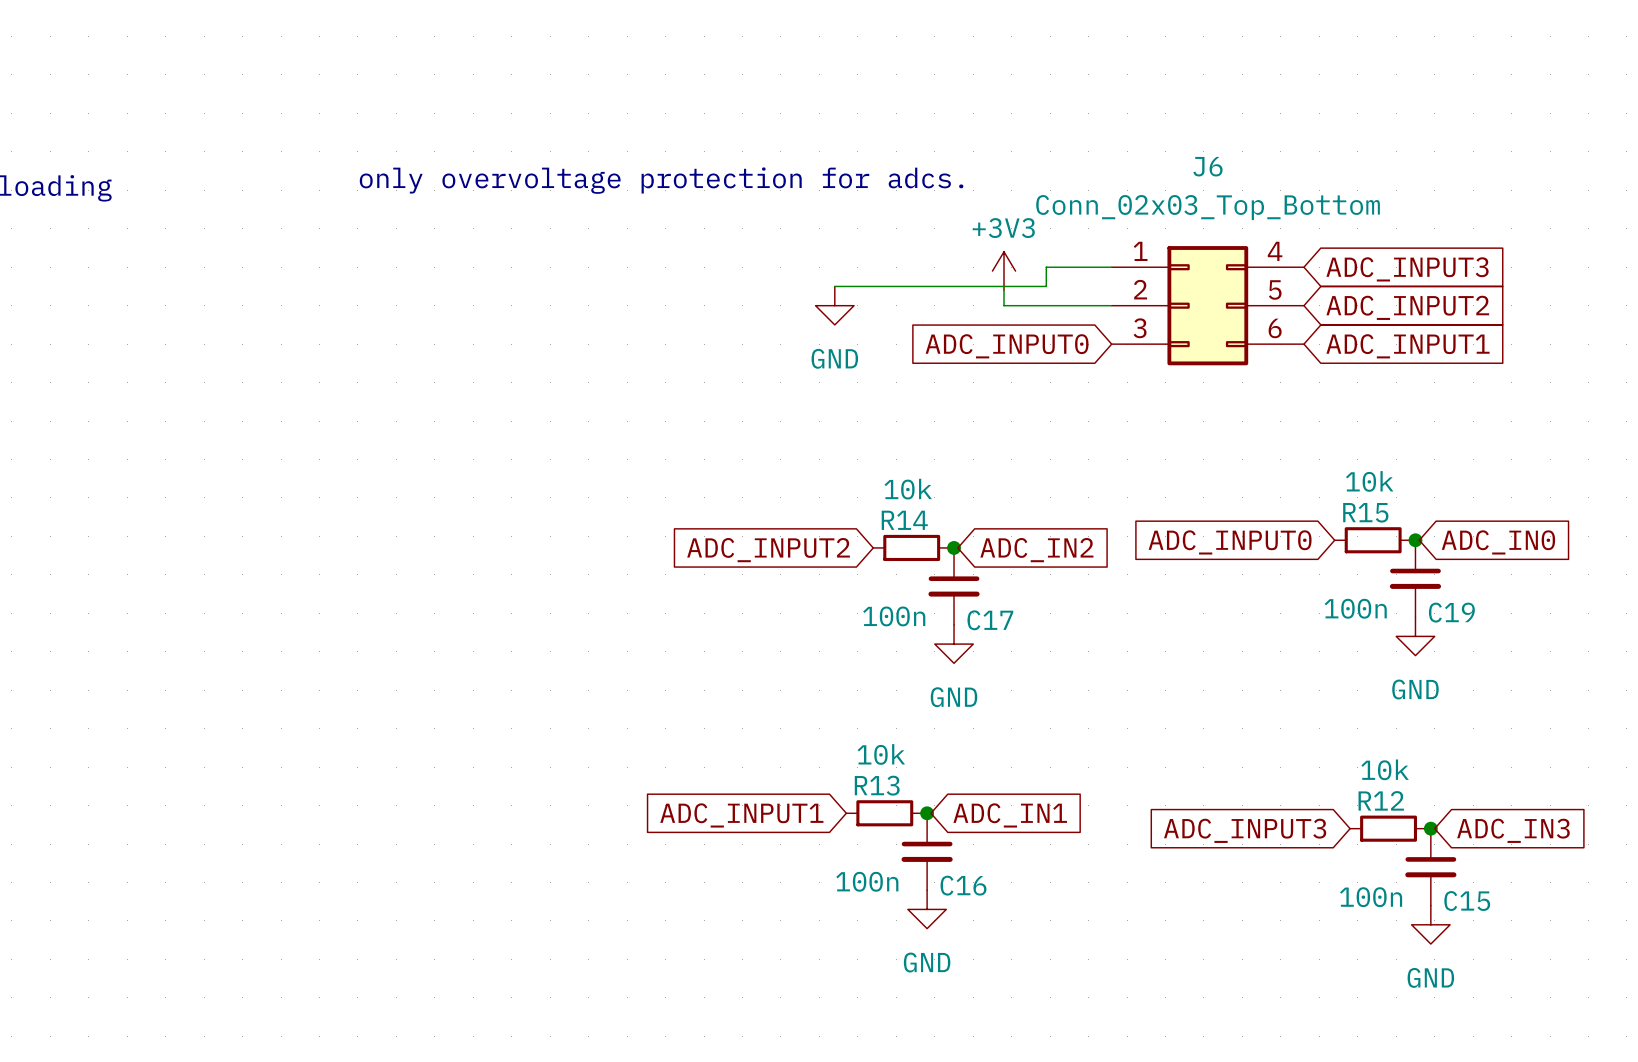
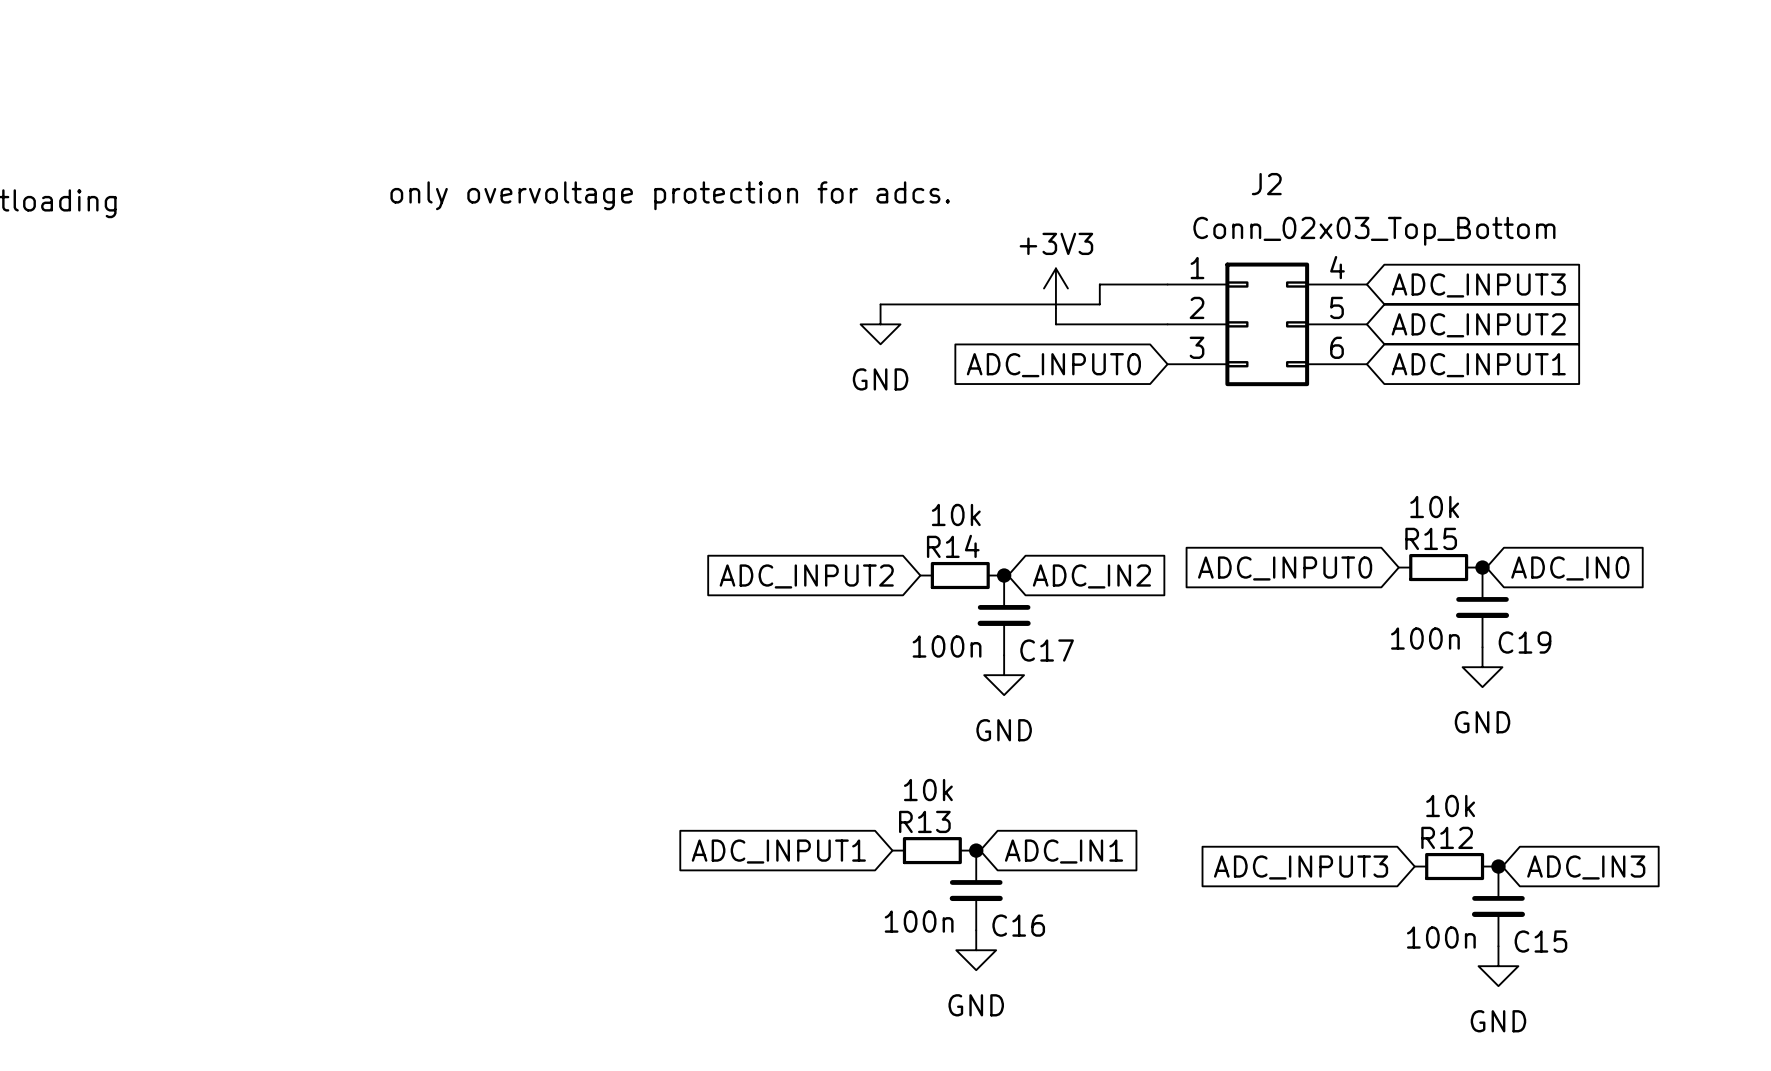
J6 name: J6 (1207, 166) -> J2 (1266, 184)
J6 value position: Conn_02x03_Top_Bottom (1208, 207) -> Conn_02x03_Top_Bottom (1374, 231)

